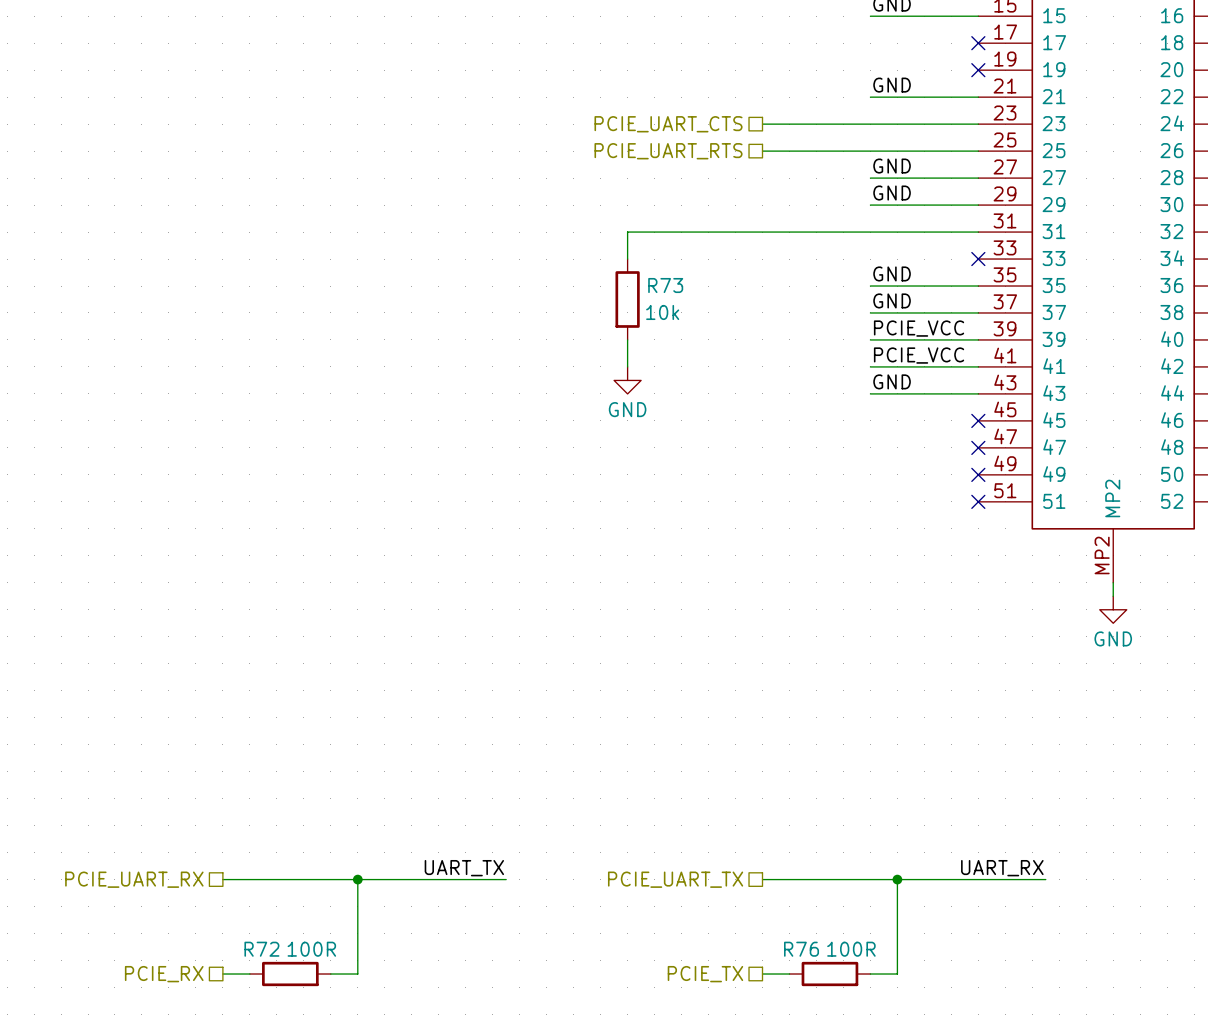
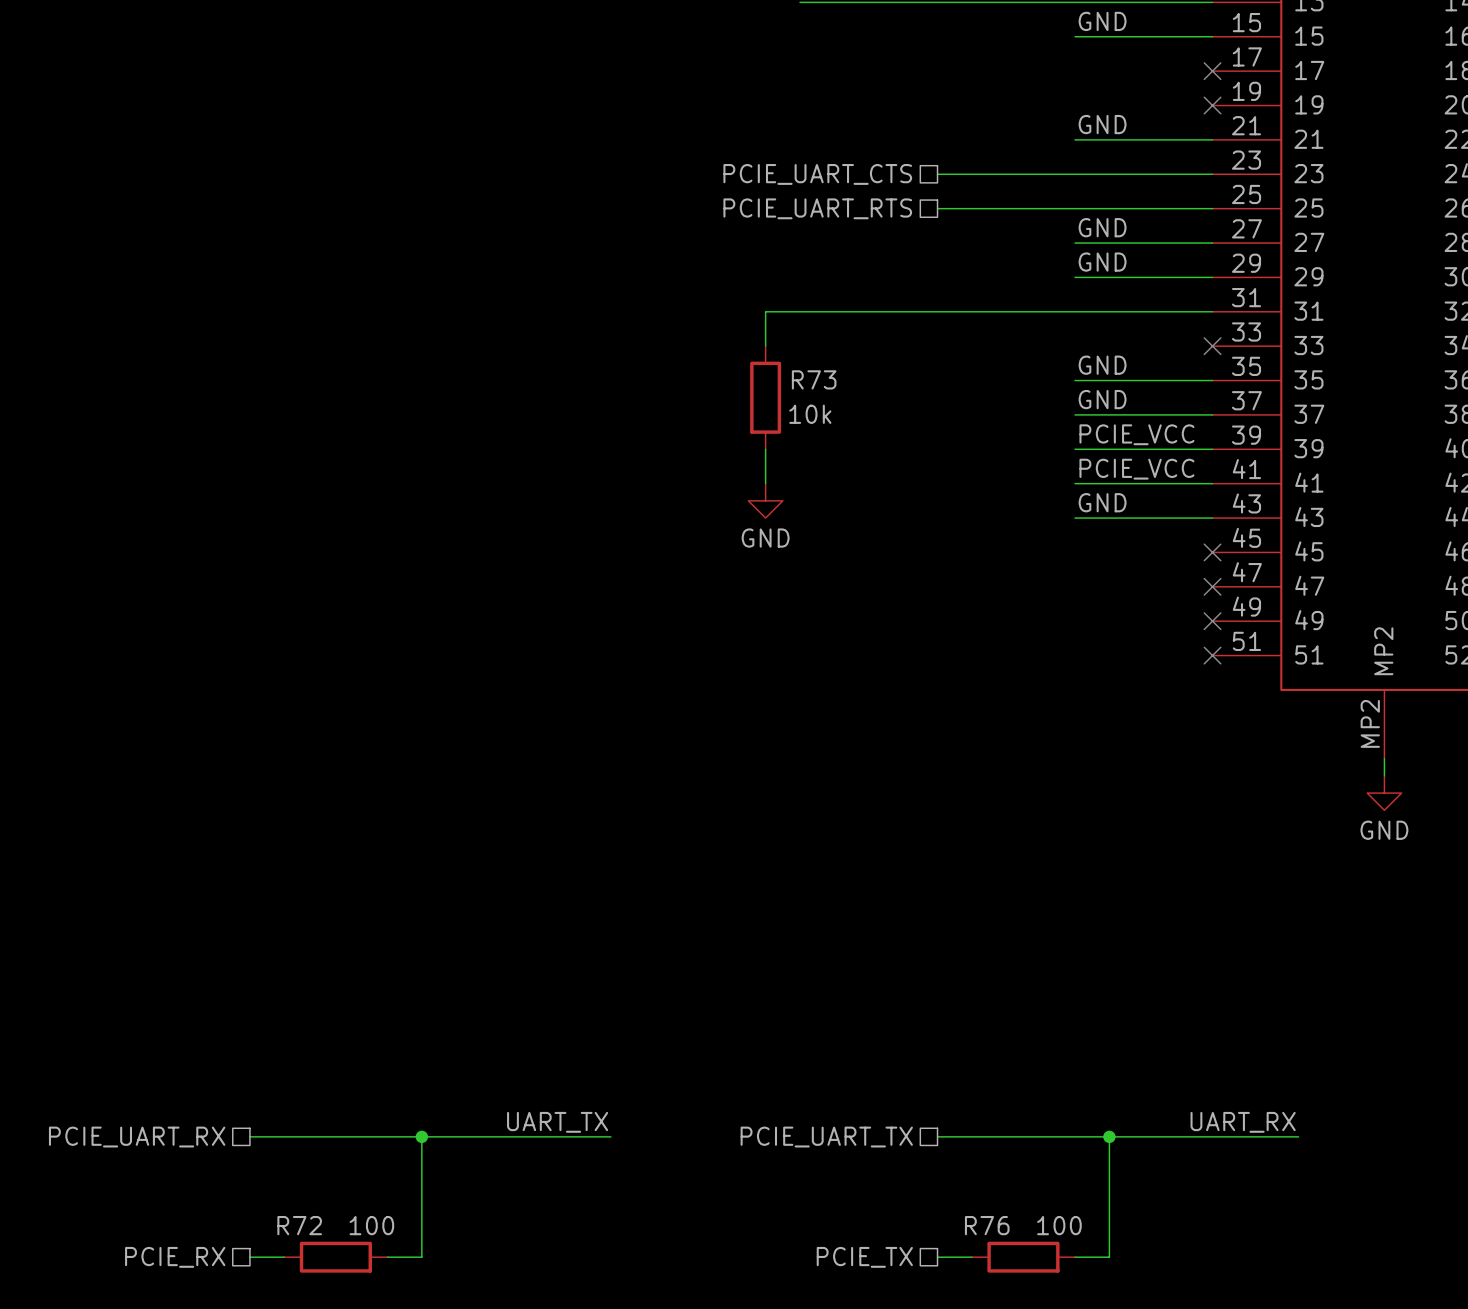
R72 value: 100R (311, 949) -> 100 (371, 1225)
R76 value: 100R (851, 949) -> 100 (1059, 1225)

